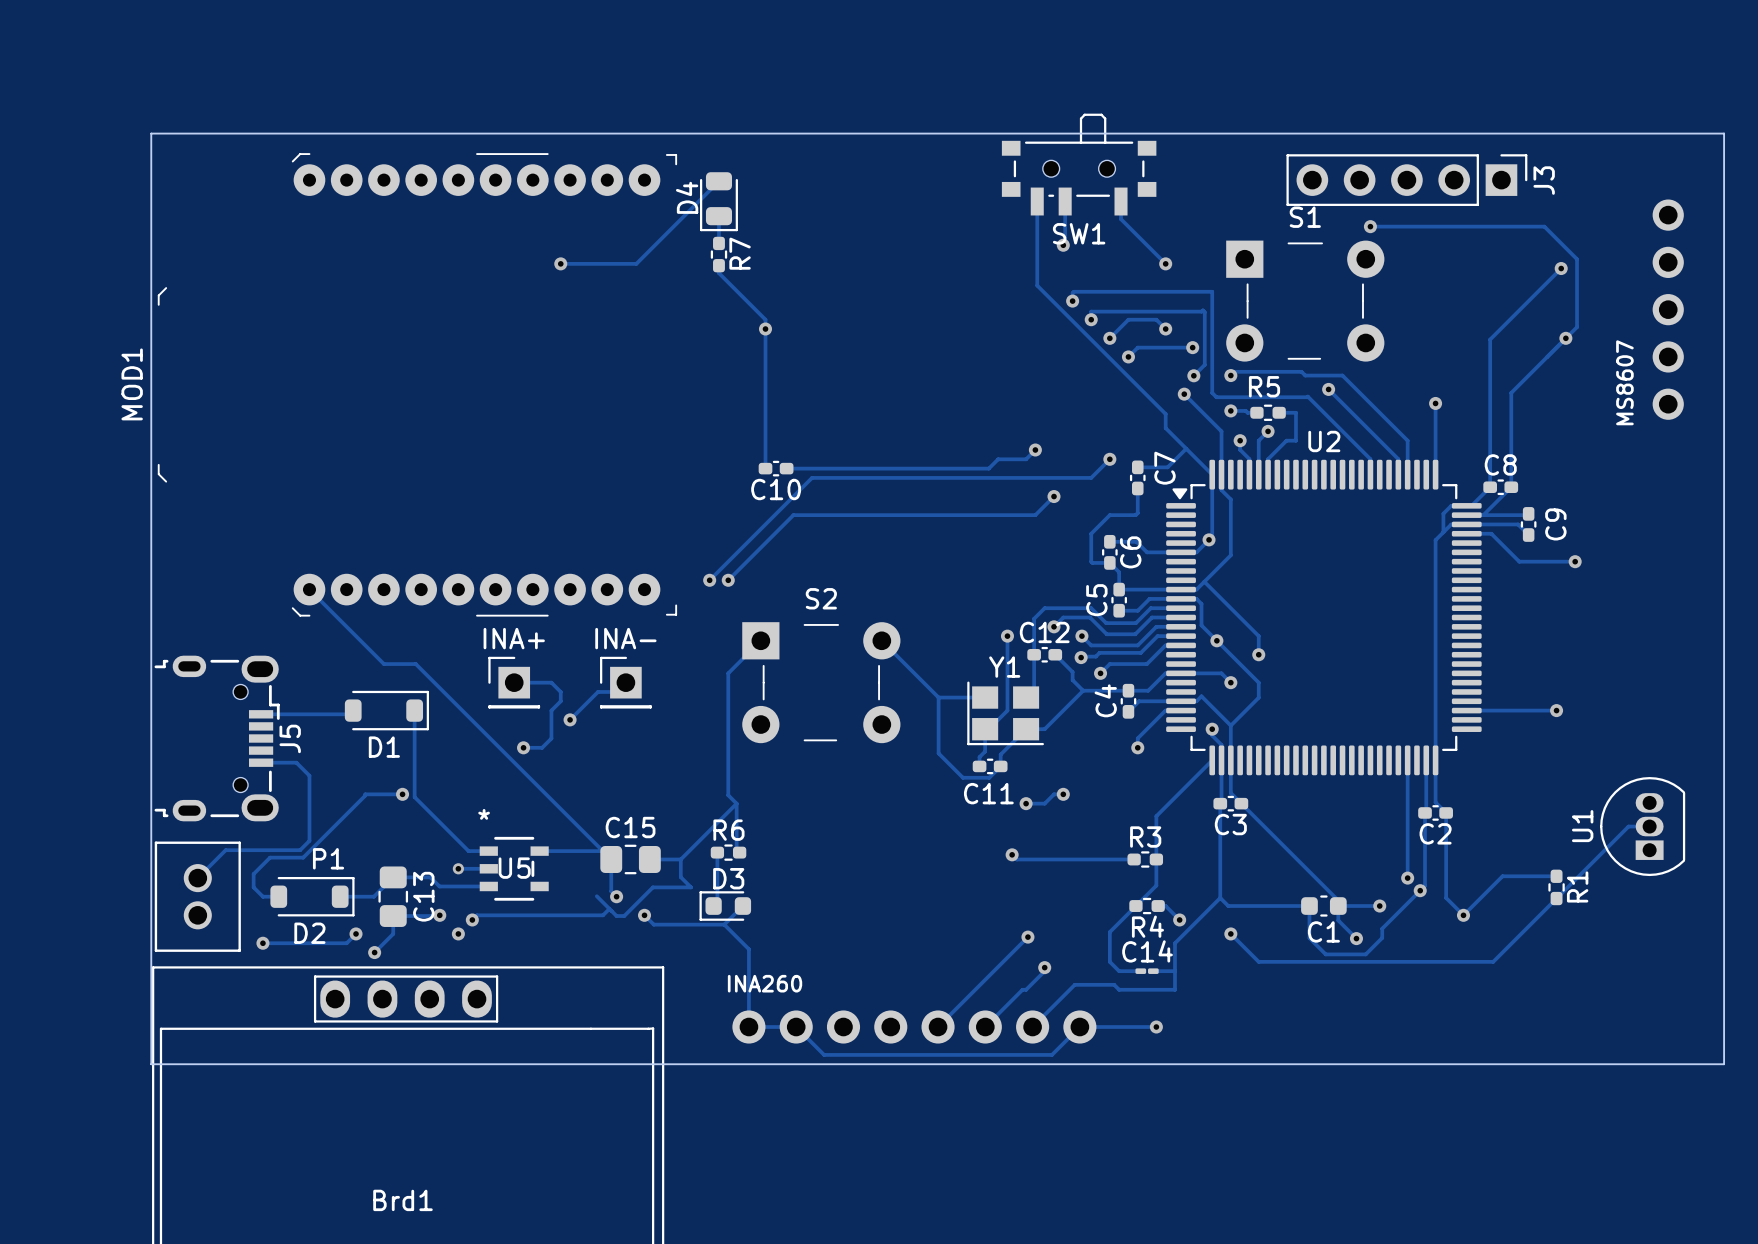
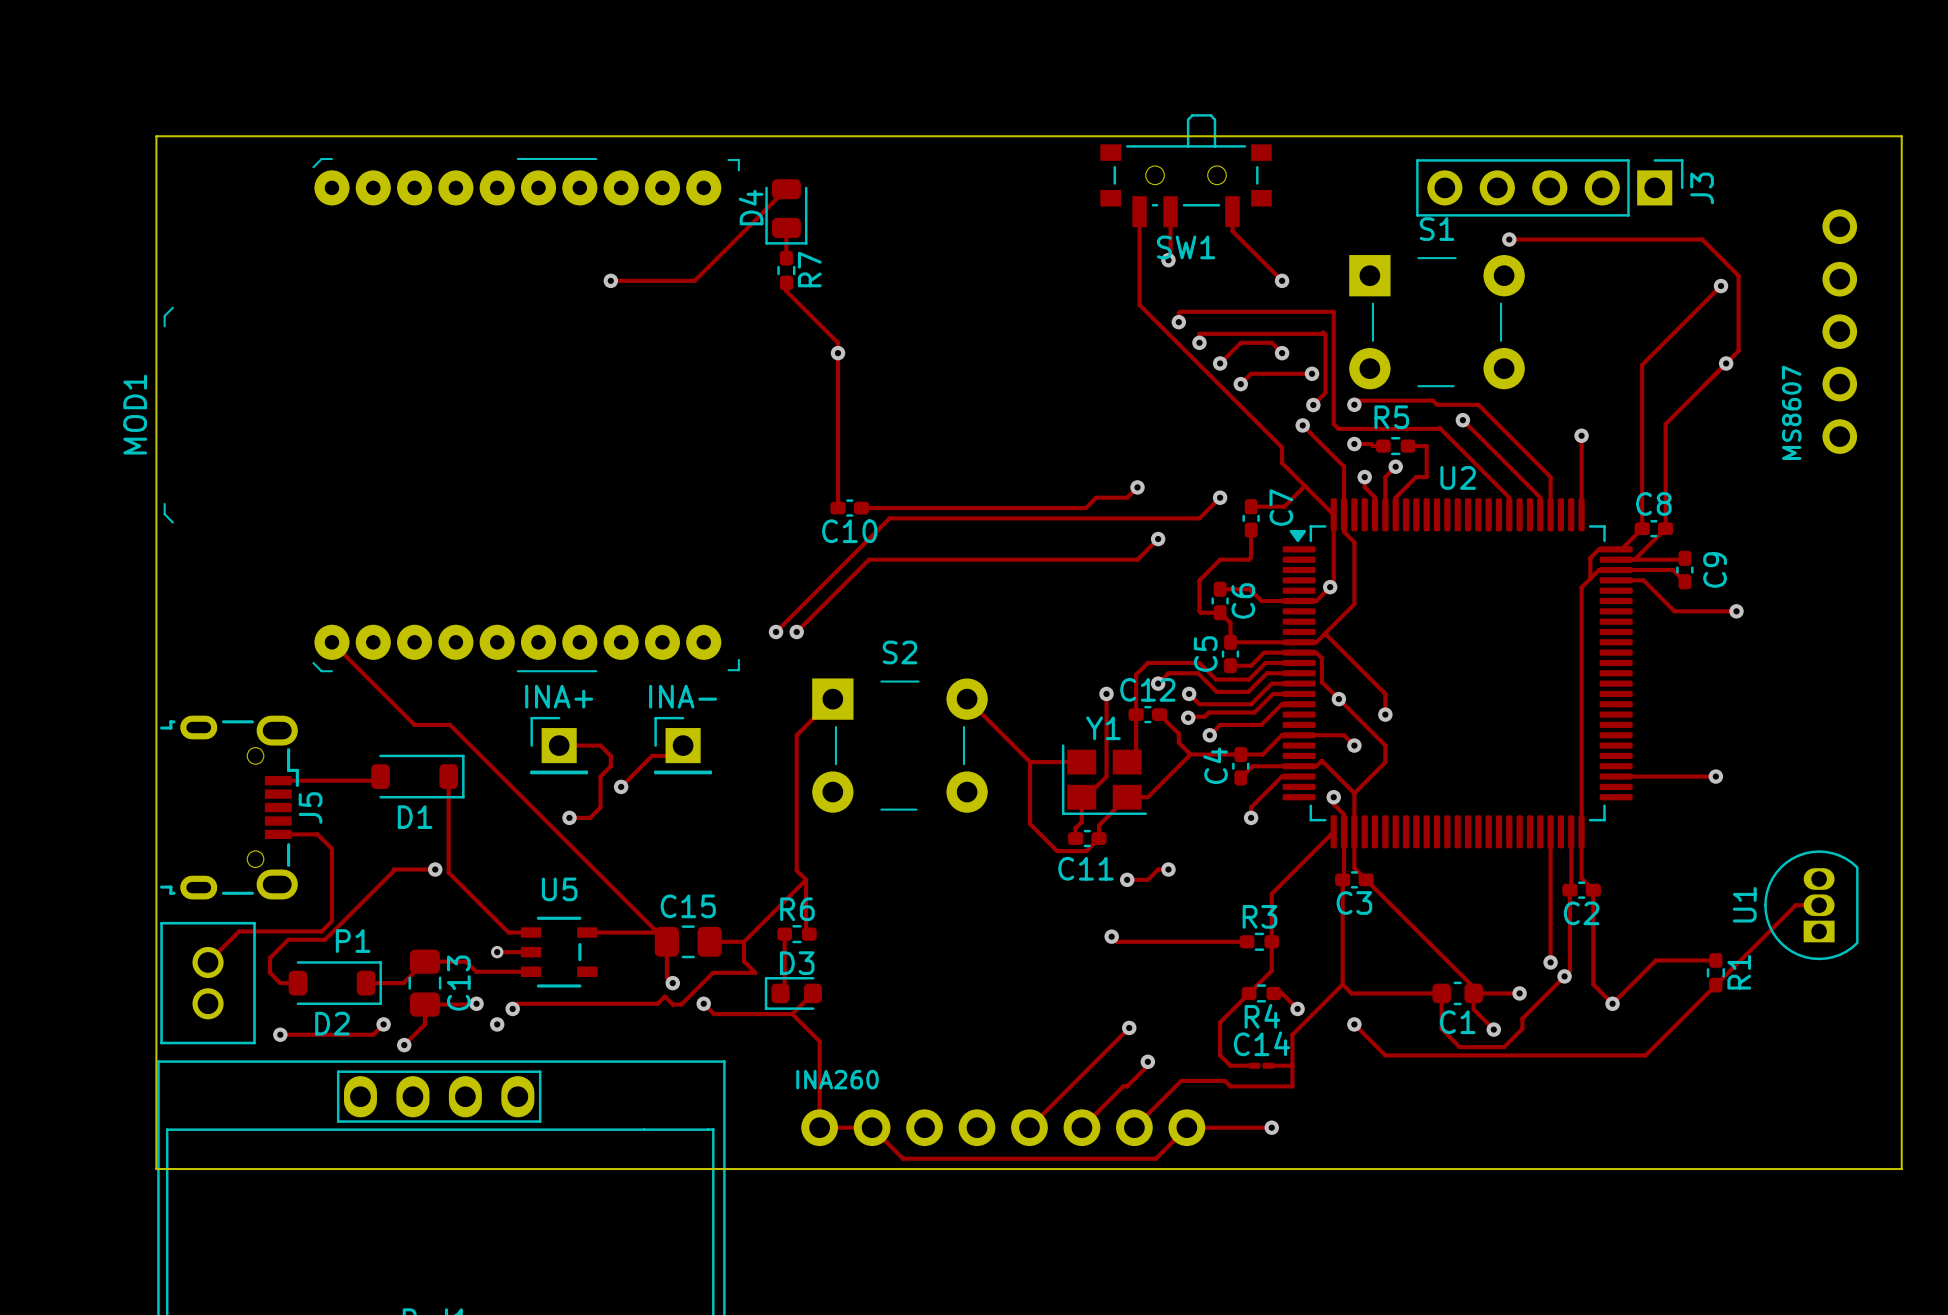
U5 text: * (484, 814) -> none
U5 name position: U5 (514, 868) -> U5 (559, 889)
track: (596, 896) (609, 908) -> none

